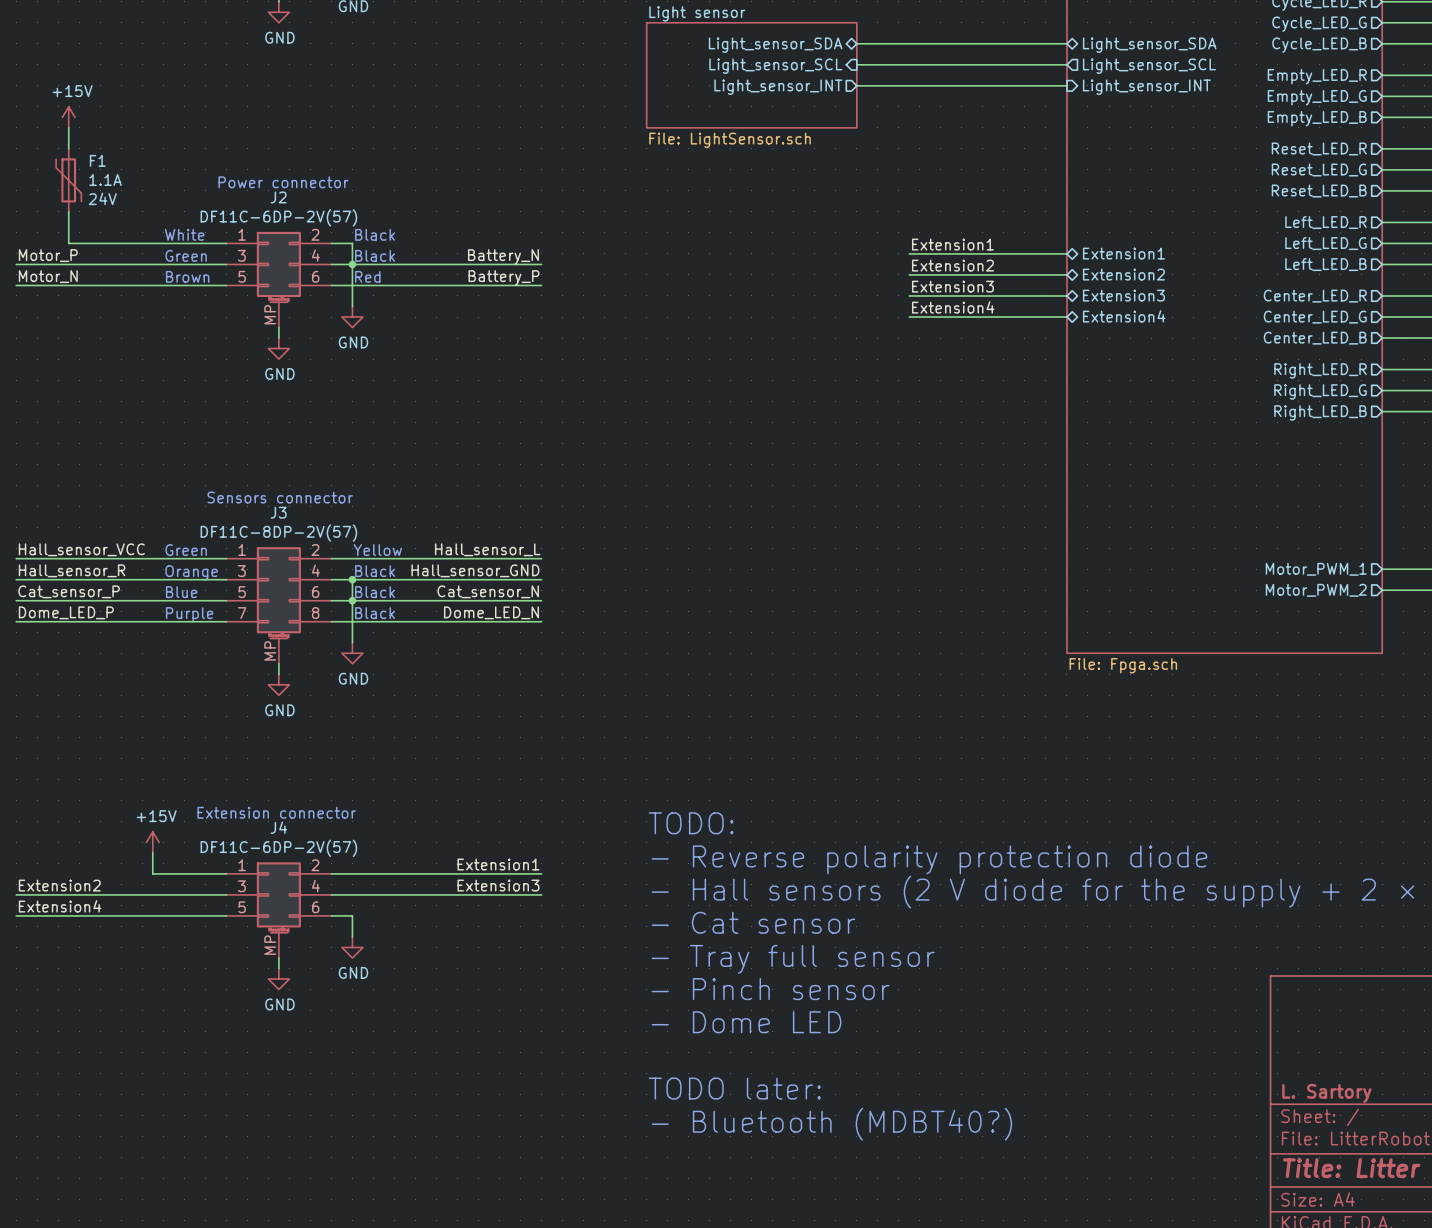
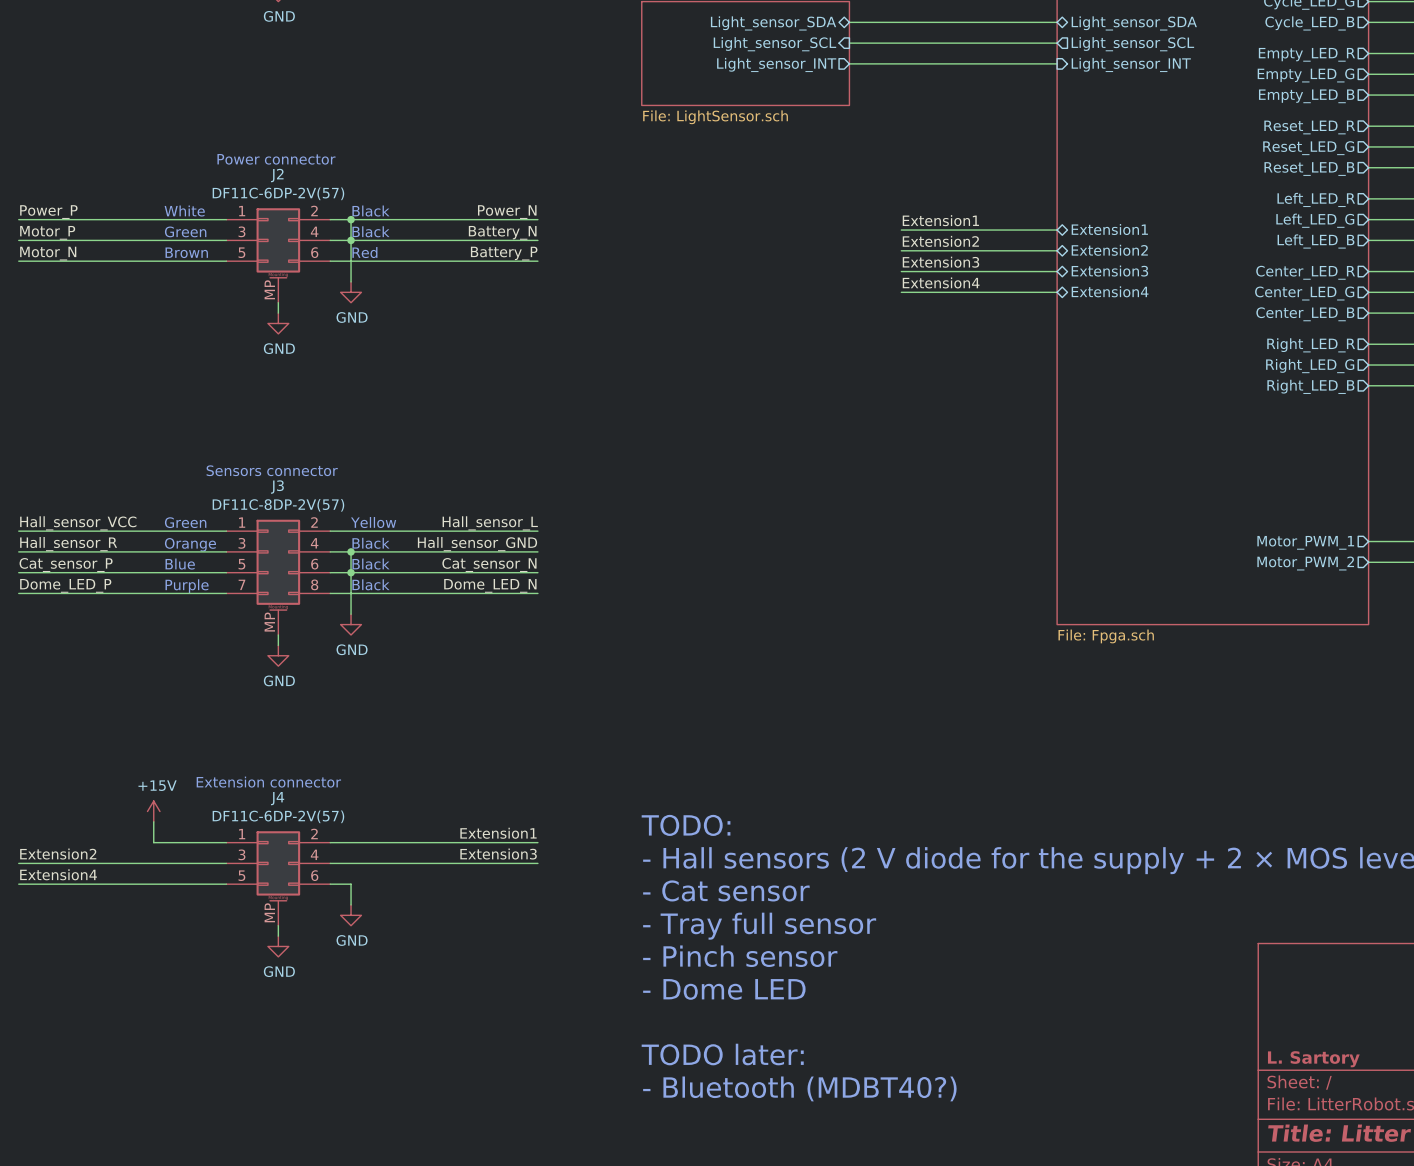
power symbol: +15V (68, 117) -> none
wire: (68, 127) (68, 148) -> none
F1: 1.1A (68, 180) -> none
wire: (68, 211) (68, 243) -> (18, 219) (70, 219)
label: none -> Power_P (48, 212)
label: none -> Power_N (507, 212)
wire: none -> (351, 219) (537, 219)
junction: none -> (351, 219)
text: TODO: (691, 823) -> none
text: - Reverse polarity protection diode (929, 859) -> TODO: (686, 825)

